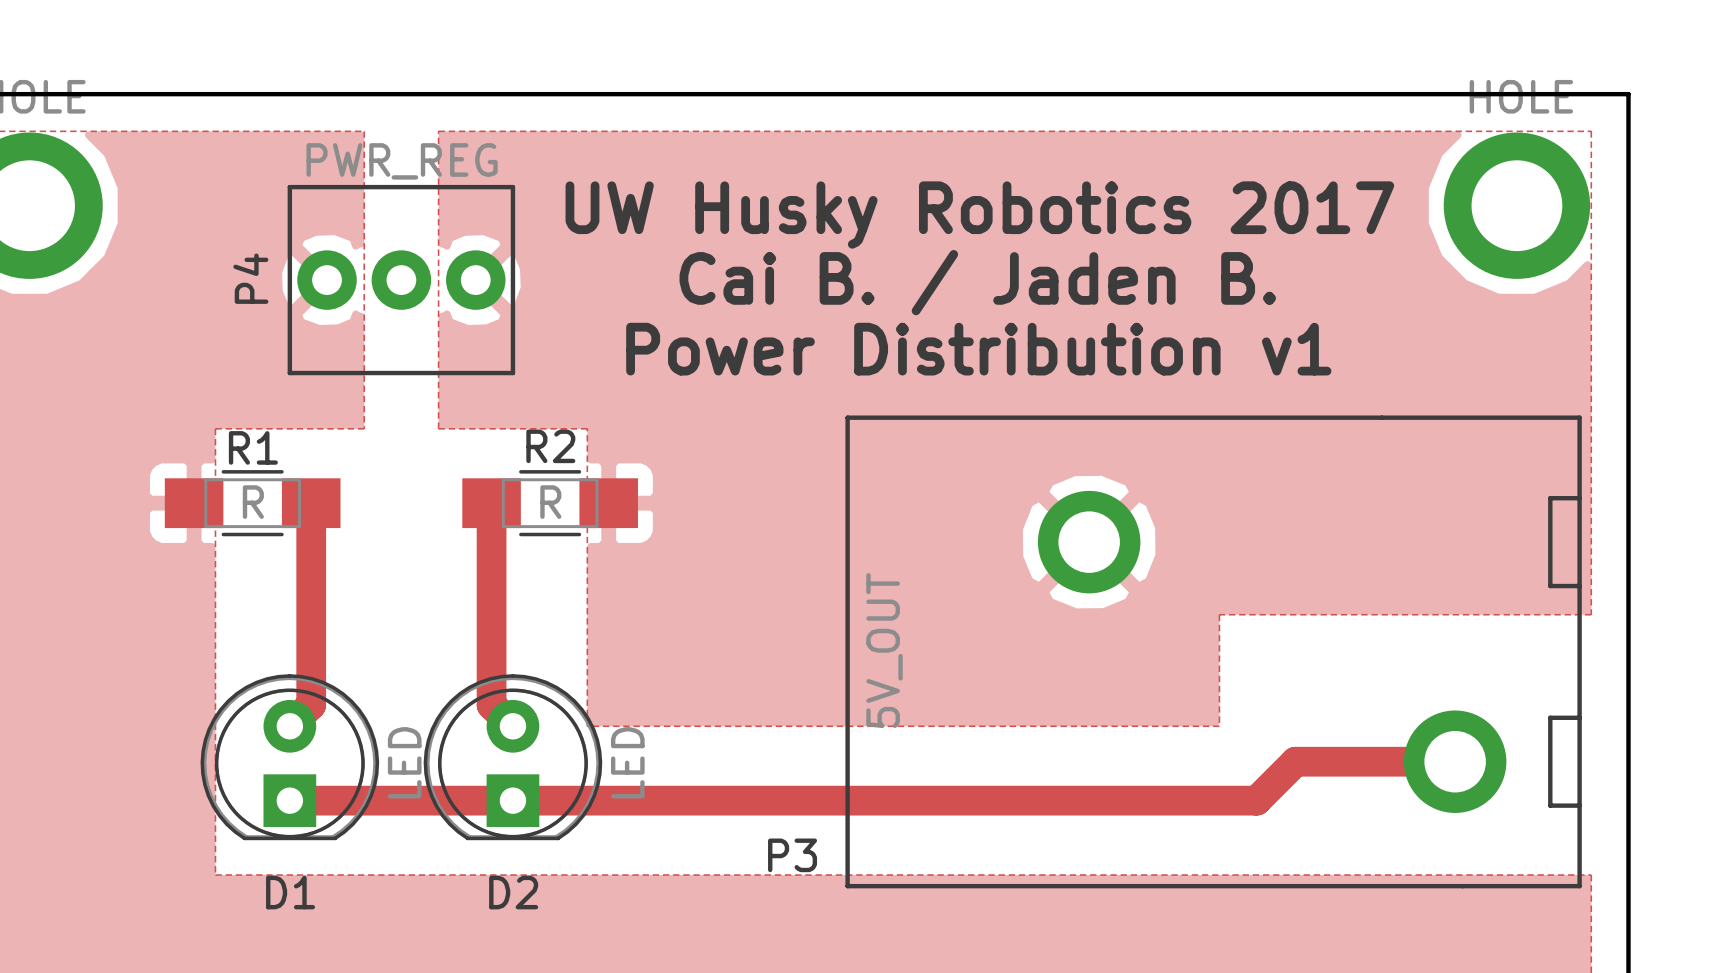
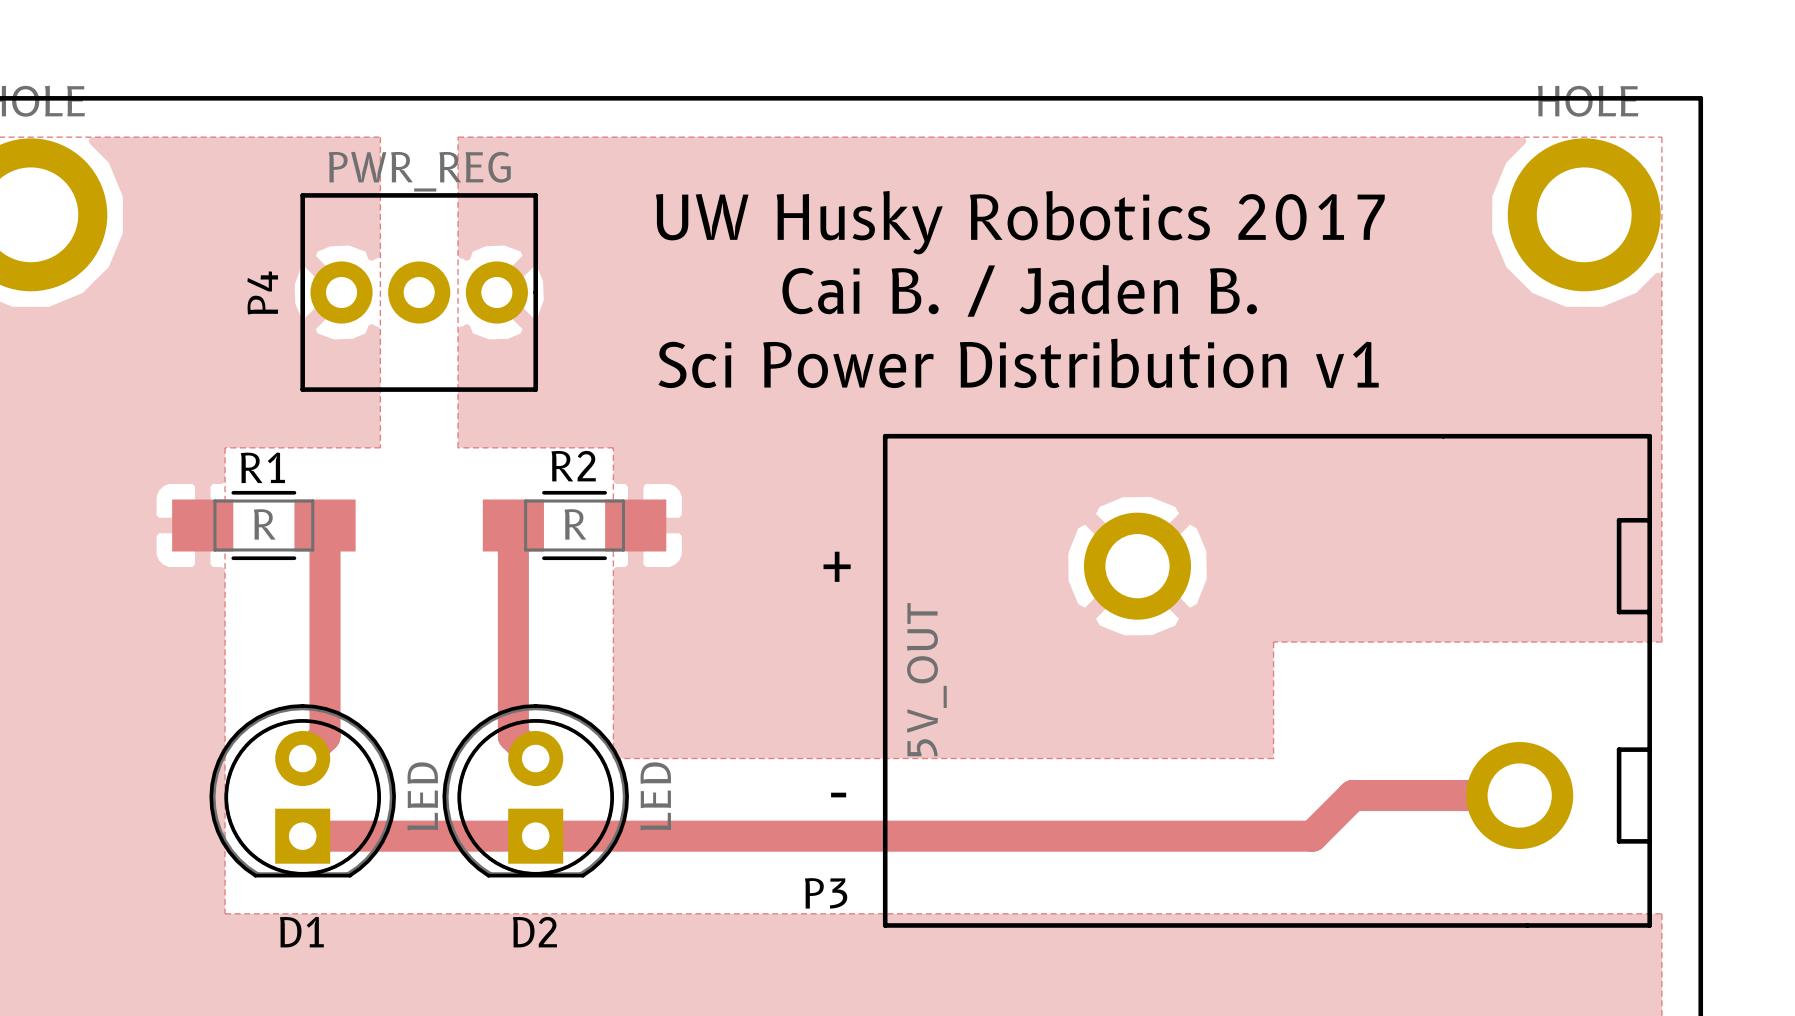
text: Power Distribution v1 (978, 349) -> Sci Power Distribution v1 (1018, 363)
text: none -> + (837, 566)
text: none -> - (838, 795)

